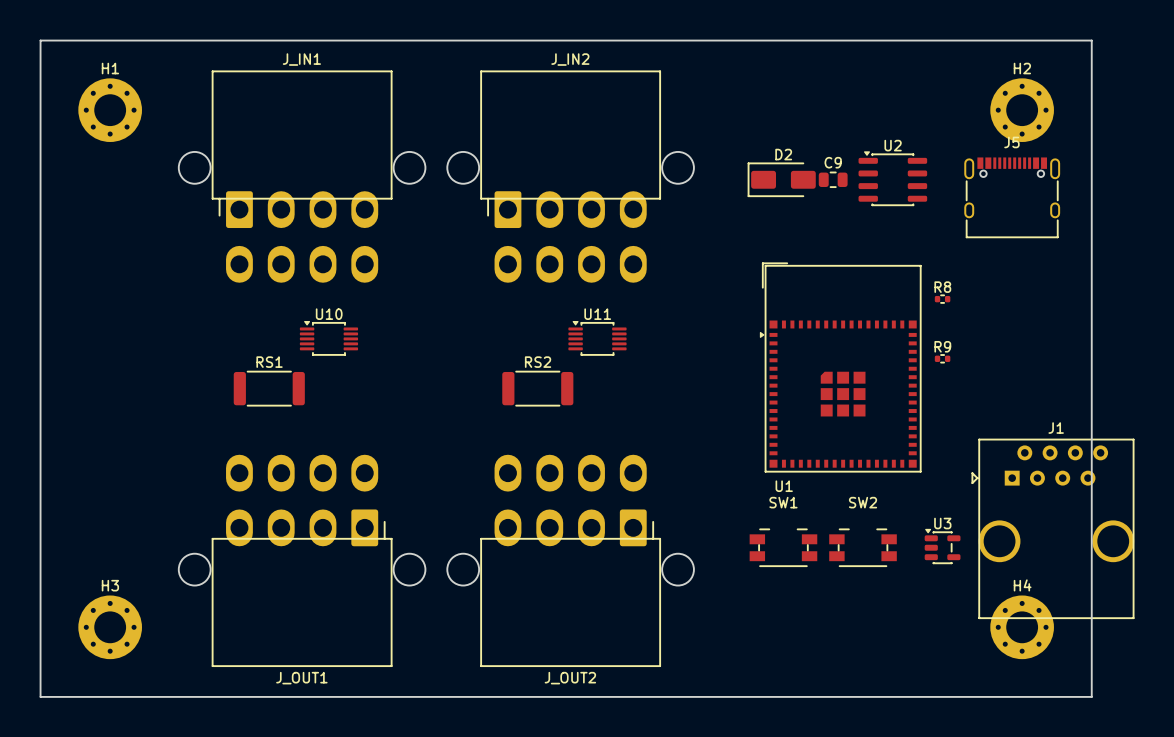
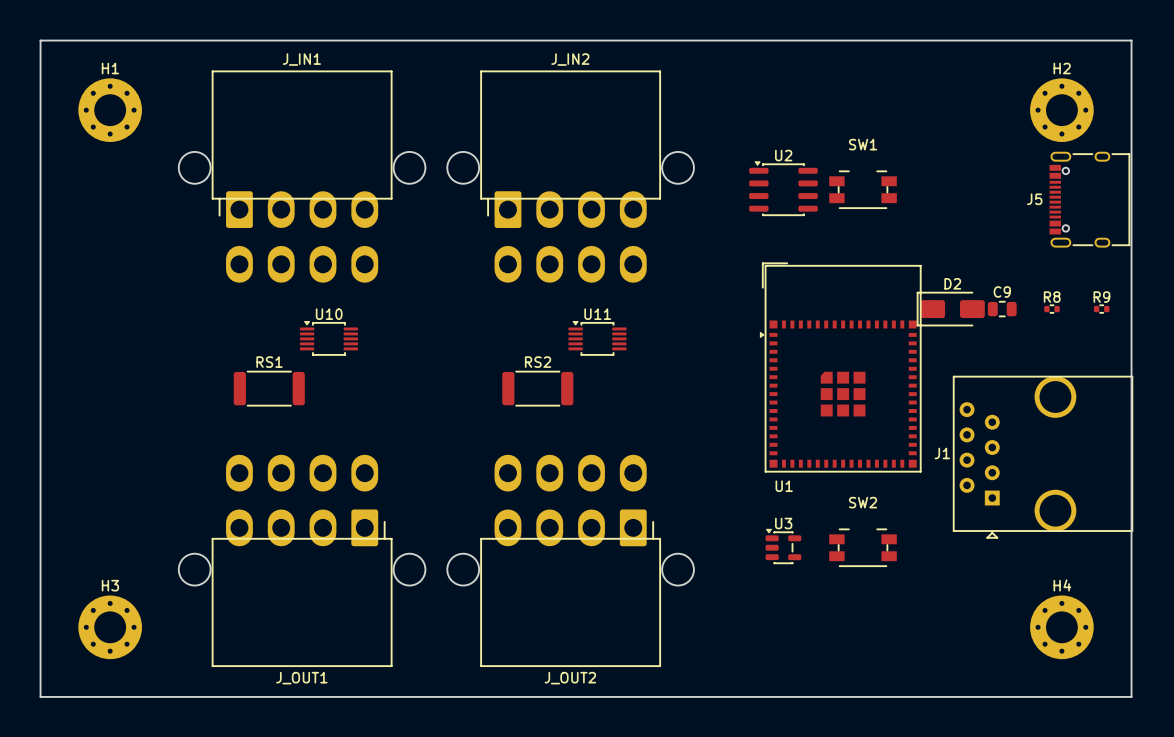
board edge: (1091, 40) (1091, 696) -> (1091, 40) (1131, 40) (1131, 696) (1091, 696)
H2 position: (1022, 110) -> (1061, 110)
U2 position: (892, 178) -> (783, 188)
D2 position: (781, 179) -> (950, 309)
C9 position: (833, 179) -> (1002, 309)
J5 rotation: 0° (1012, 197) -> 90° counterclockwise (1089, 199)
J5 position: (1012, 197) -> (1089, 199)
R8 position: (942, 299) -> (1051, 309)
R9 position: (942, 358) -> (1101, 309)
J1 rotation: 0° (1052, 528) -> 90° counterclockwise (1043, 457)
U3 position: (942, 546) -> (783, 546)
SW1 position: (783, 547) -> (863, 189)
H4 position: (1022, 627) -> (1061, 627)

